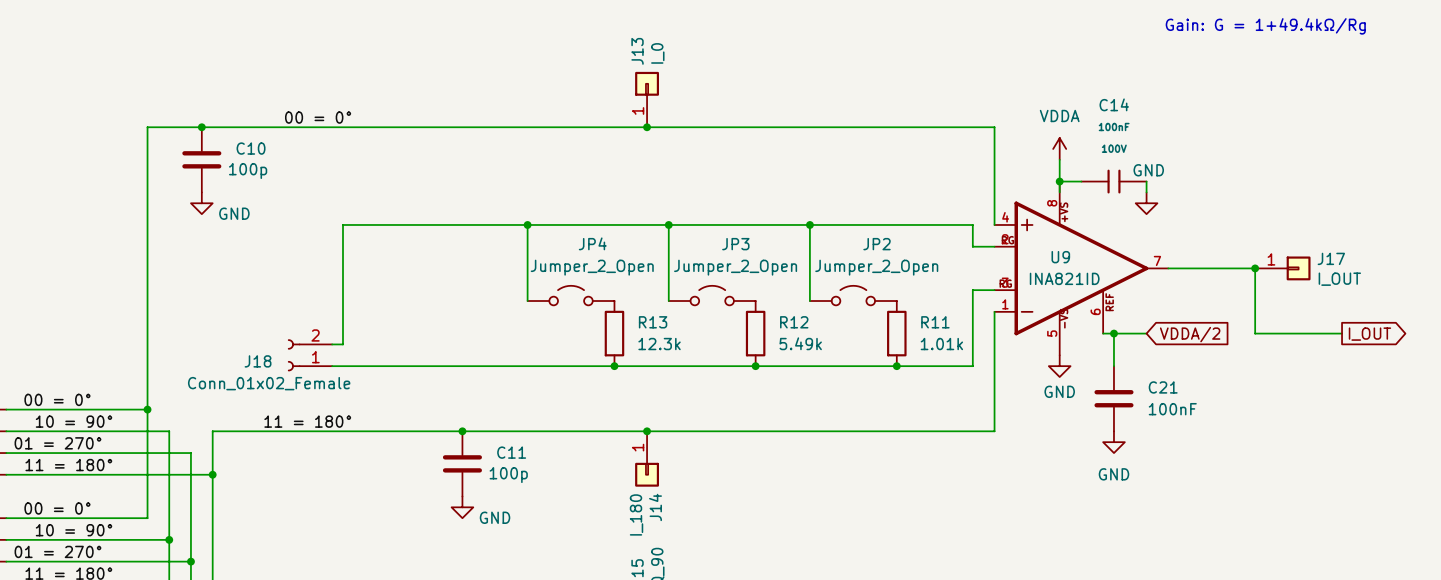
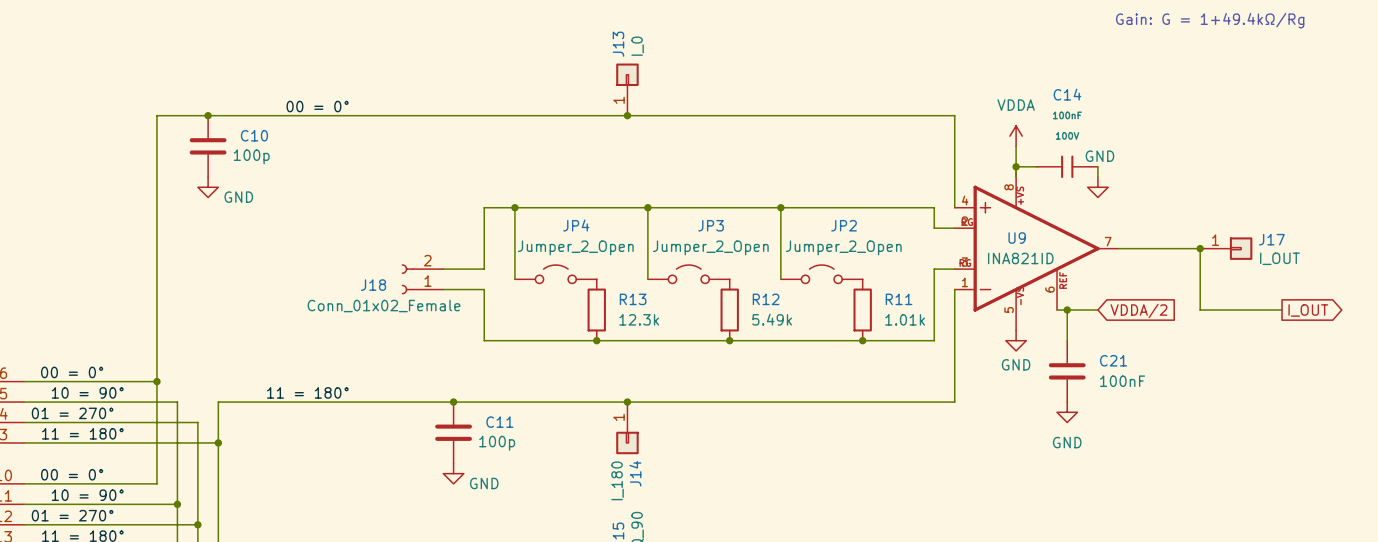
wire: (495, 224) (342, 224) (342, 344) (332, 344) -> (484, 207) (484, 269) (443, 269)
J18 position: (310, 355) -> (422, 279)
wire: (332, 366) (495, 366) -> (443, 289) (484, 289) (484, 340)

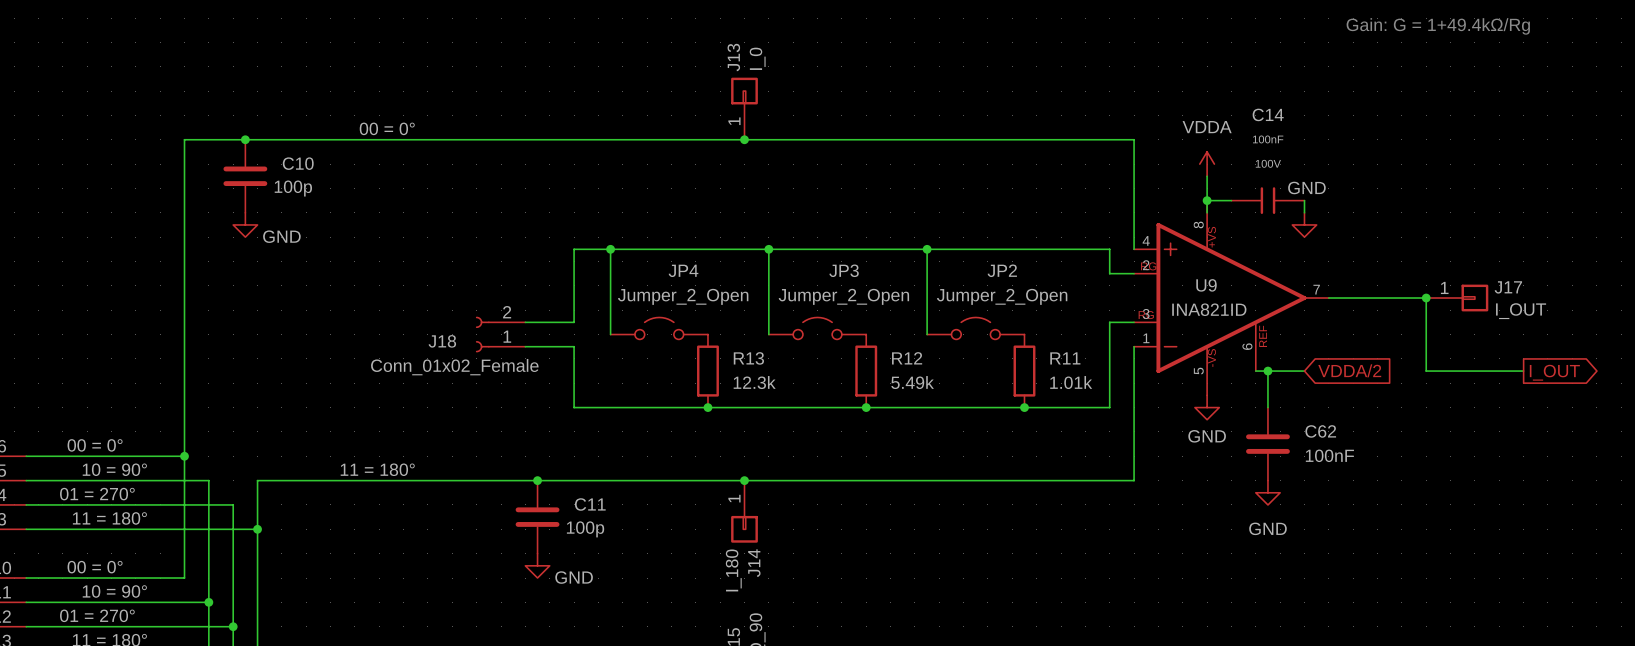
C21 name: C21 (1113, 360) -> C62 (1320, 431)

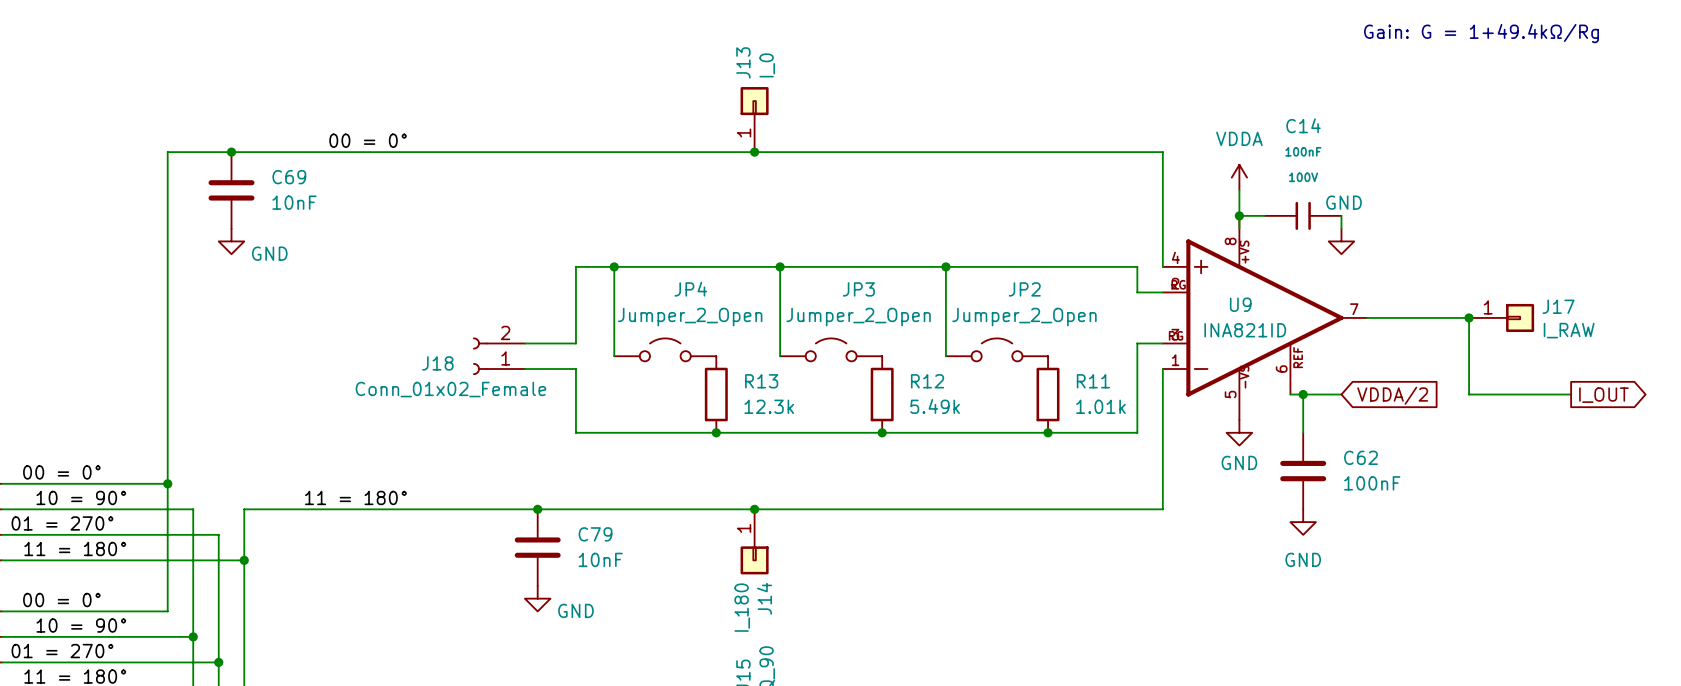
C10 name: C10 (298, 163) -> C69 (289, 177)
C10 value: 100p (293, 188) -> 10nF (294, 202)
J17 value: I_OUT (1521, 311) -> I_RAW (1569, 330)
C11 name: C11 (590, 504) -> C79 (595, 534)
C11 value: 100p (585, 529) -> 10nF (600, 559)

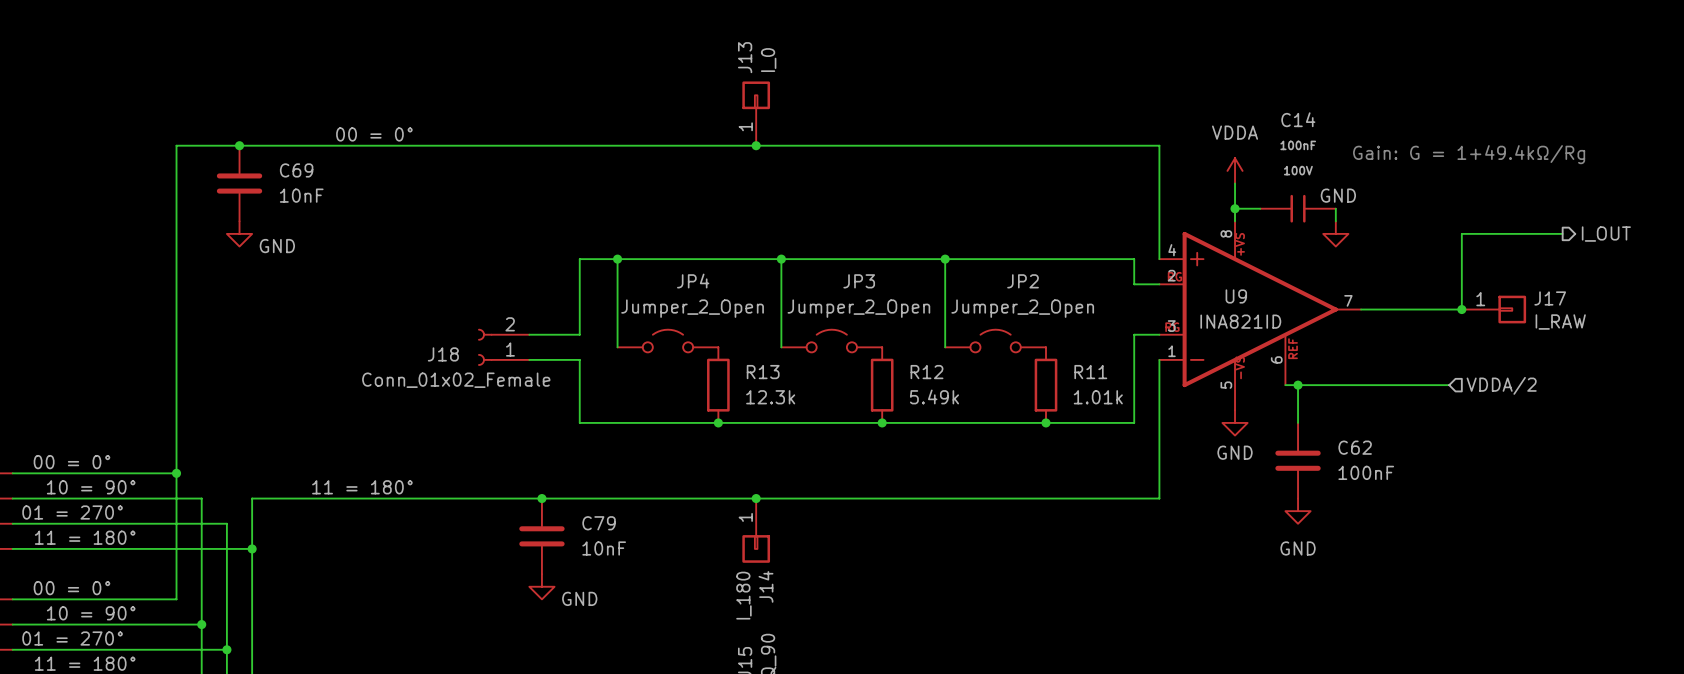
text position: Gain: G = 1+49.4kΩ/Rg (1481, 33) -> Gain: G = 1+49.4kΩ/Rg (1469, 154)
hierarchical label: none -> I_OUT (1606, 234)
wire: (1469, 317) (1469, 394) (1571, 394) -> (1461, 309) (1461, 233) (1562, 233)
wire: none -> (1335, 385) (1449, 385)
global label: VDDA/2 (1392, 395) -> none
hierarchical label: none -> VDDA/2 (1501, 385)
global label: I_OUT (1603, 395) -> none

